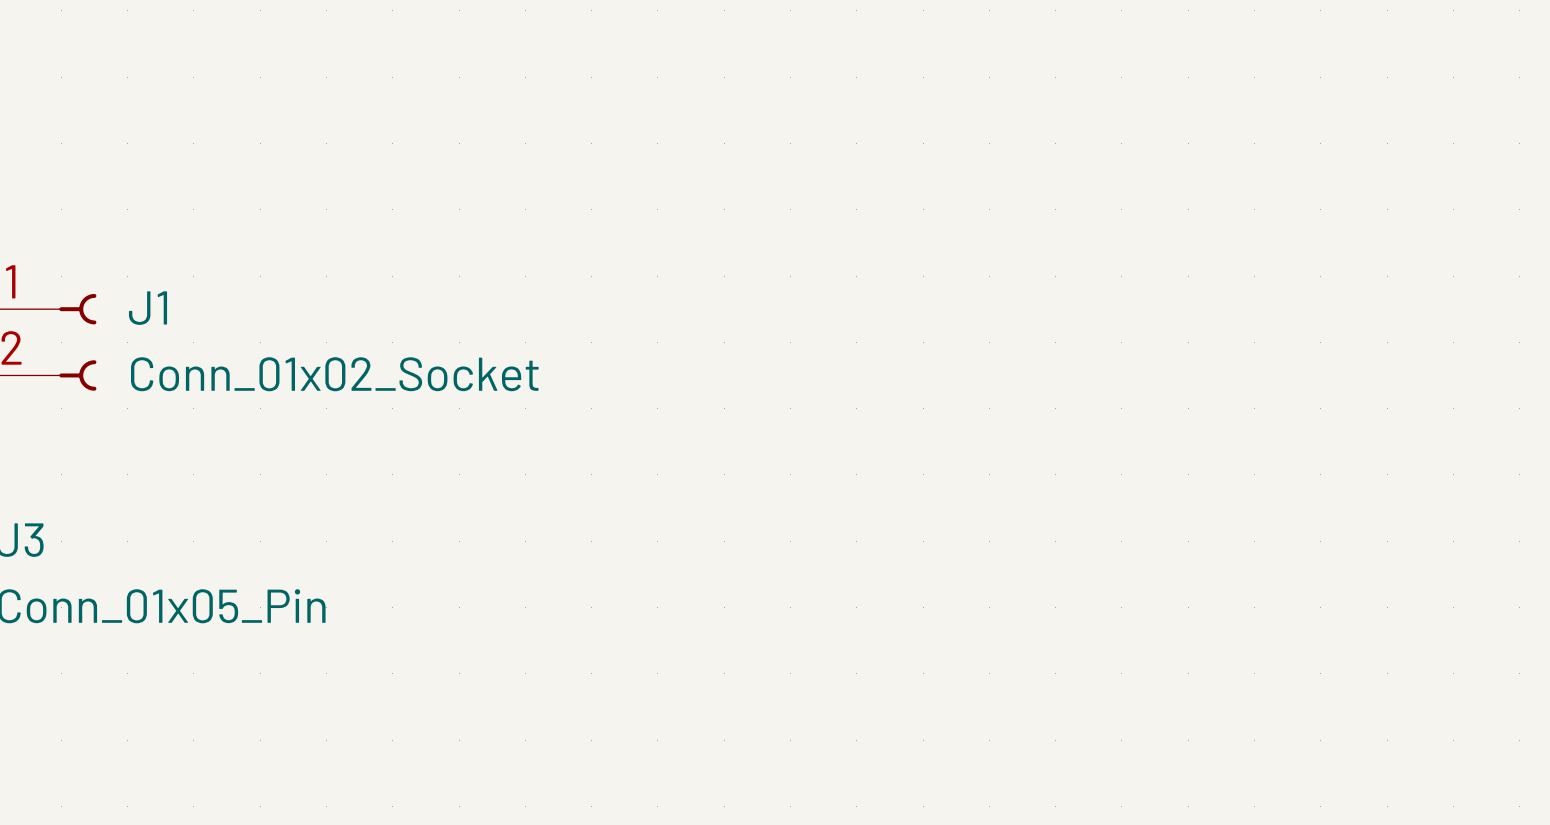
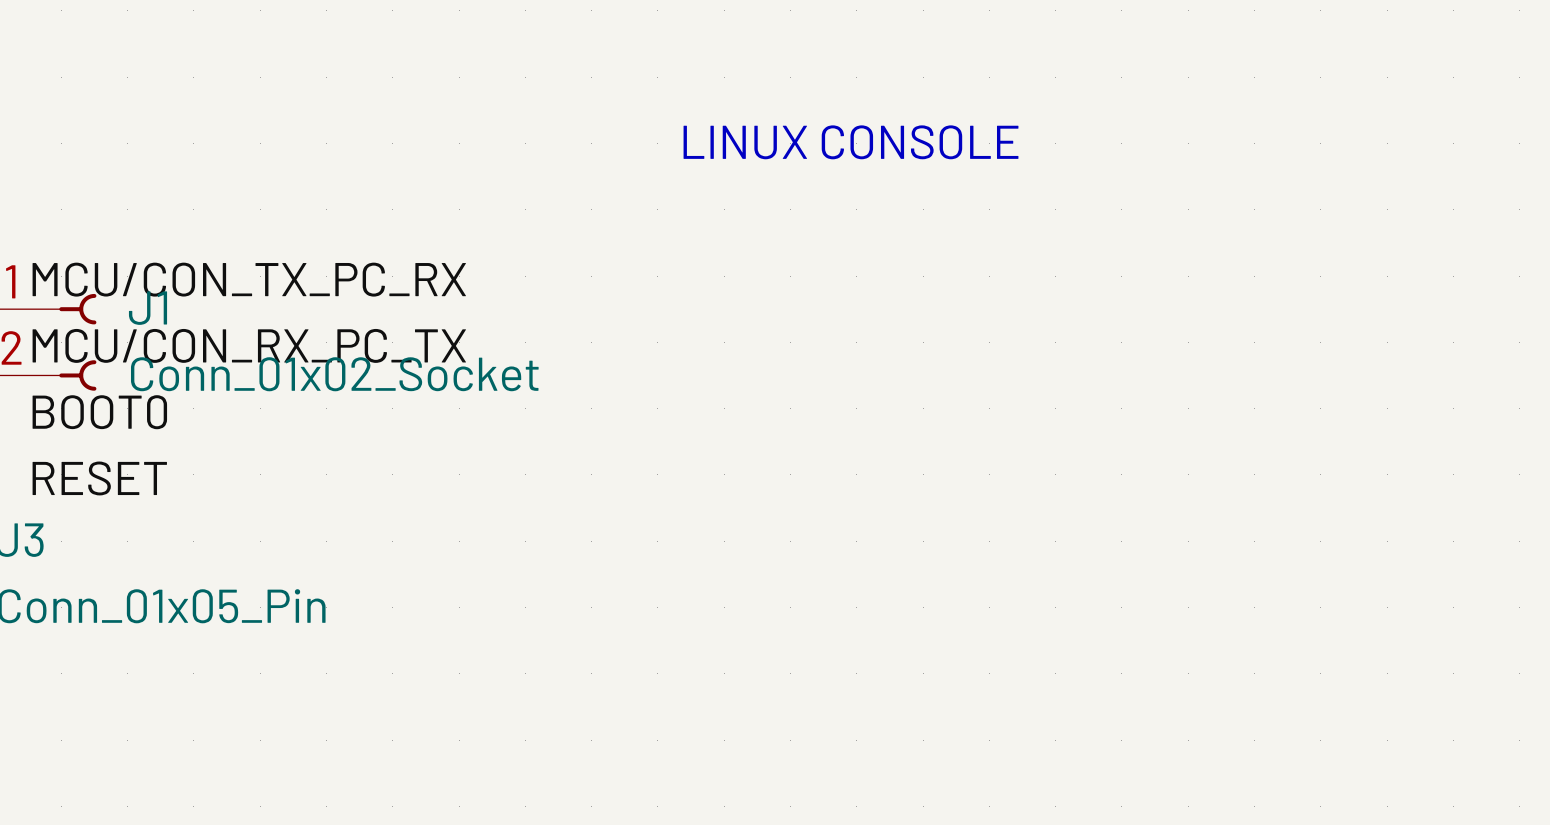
text: none -> LINUX CONSOLE (851, 142)
label: none -> MCU/CON_TX_PC_RX (249, 279)
label: none -> MCU/CON_RX_PC_TX (249, 345)
label: none -> BOOT0 (99, 412)
label: none -> RESET (99, 478)

